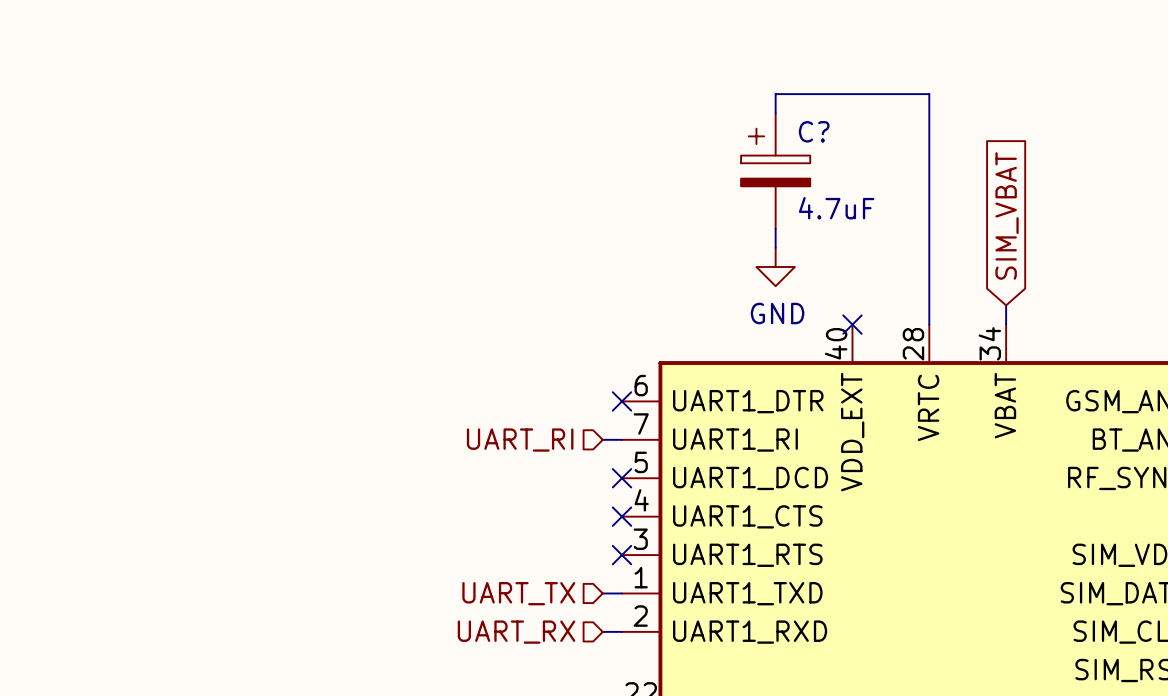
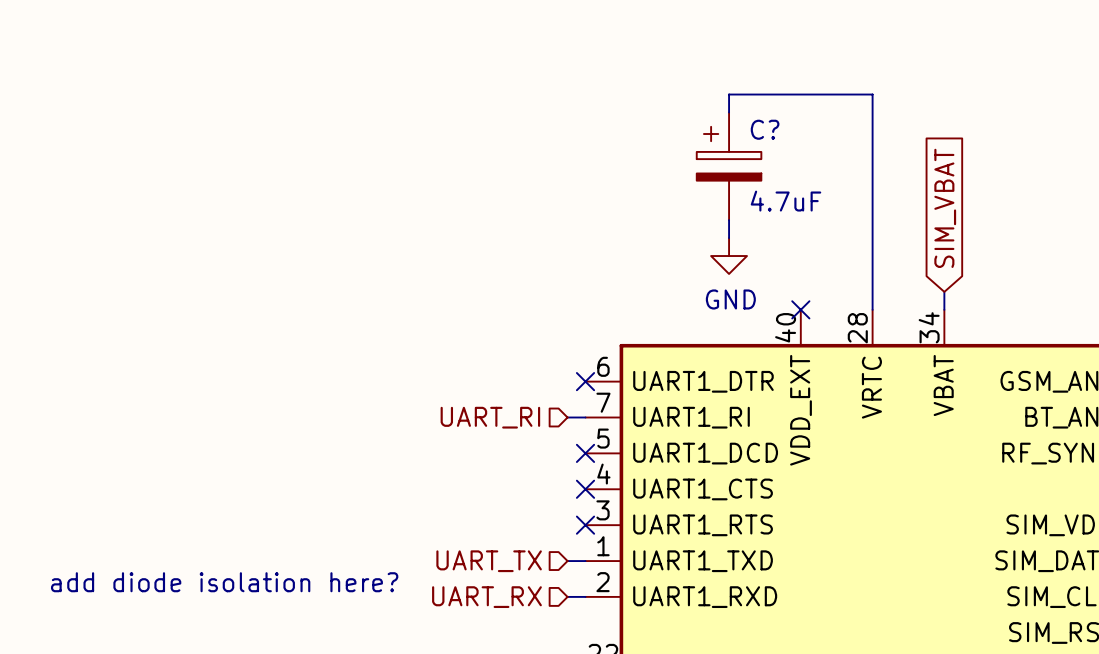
text: none -> add diode isolation here? (224, 582)

